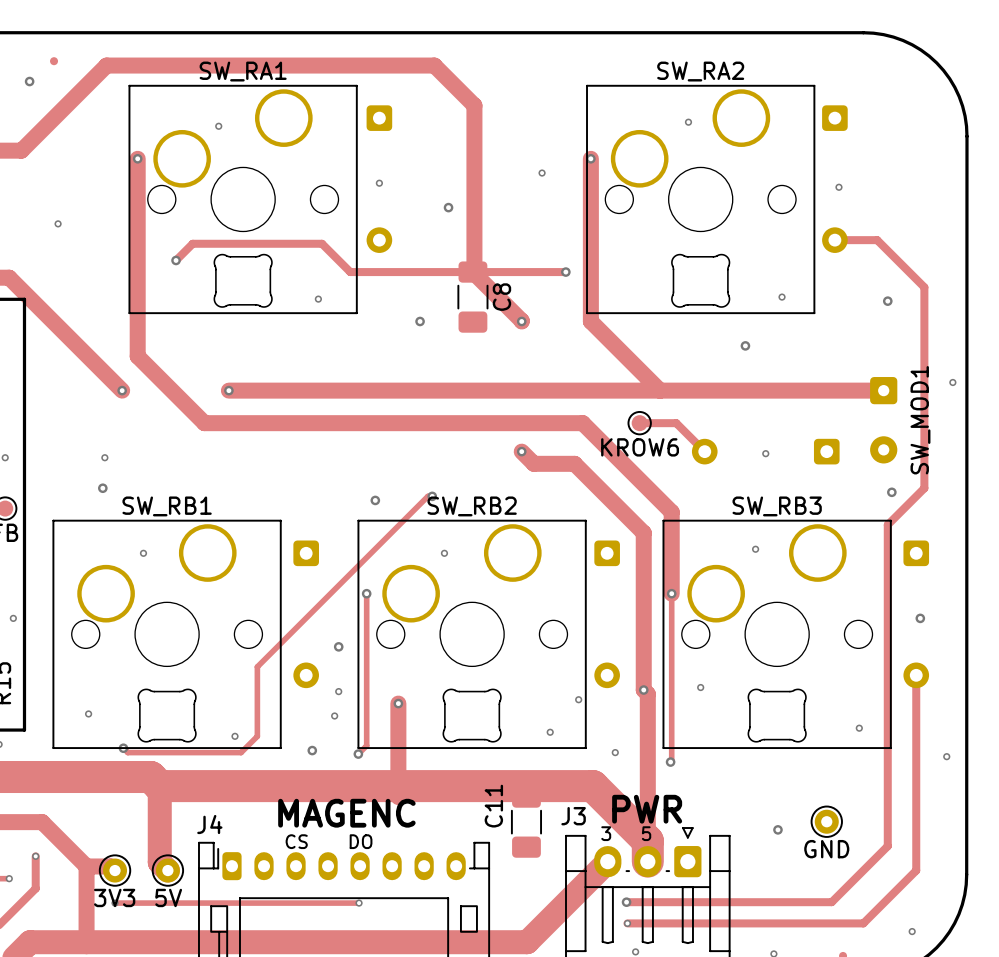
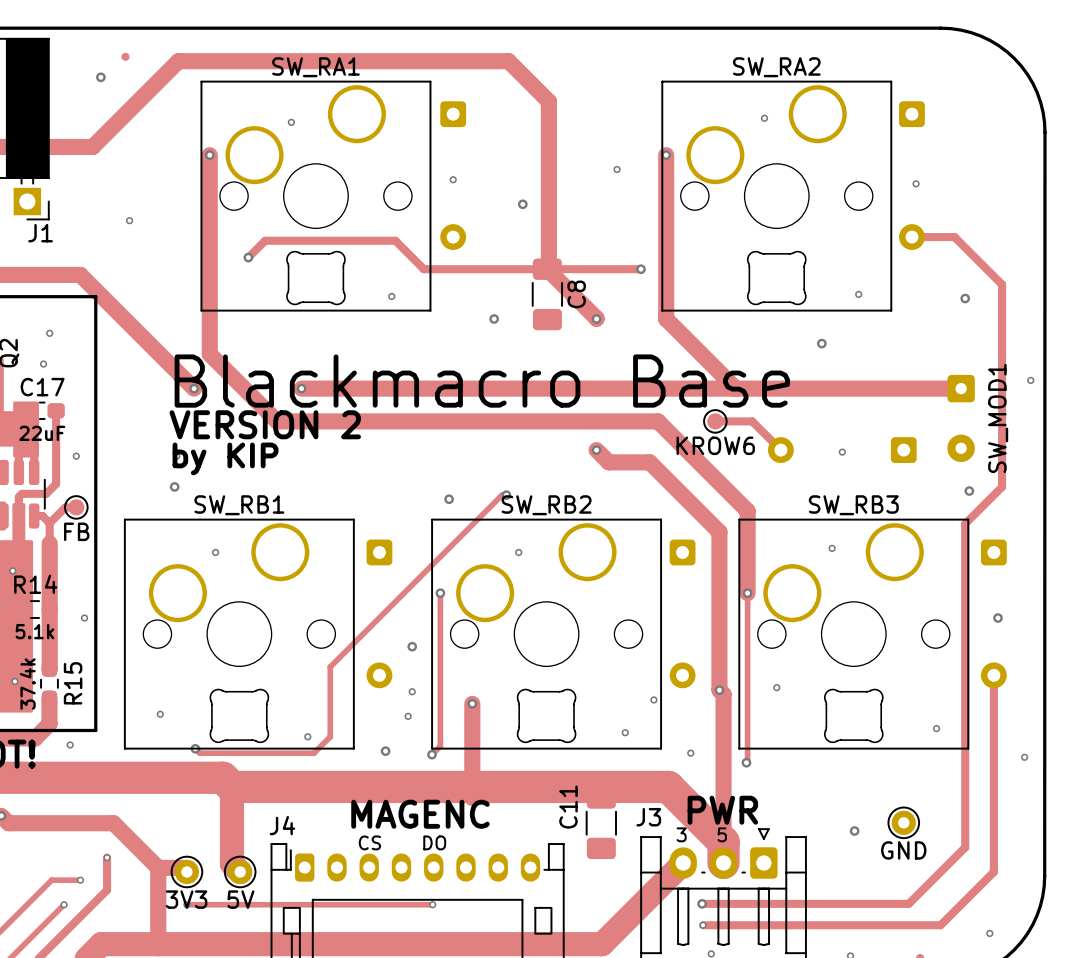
text: none -> Blackmacro Base (482, 381)
text: none -> VERSION 2 (265, 424)
text: none -> by KIP (225, 458)

